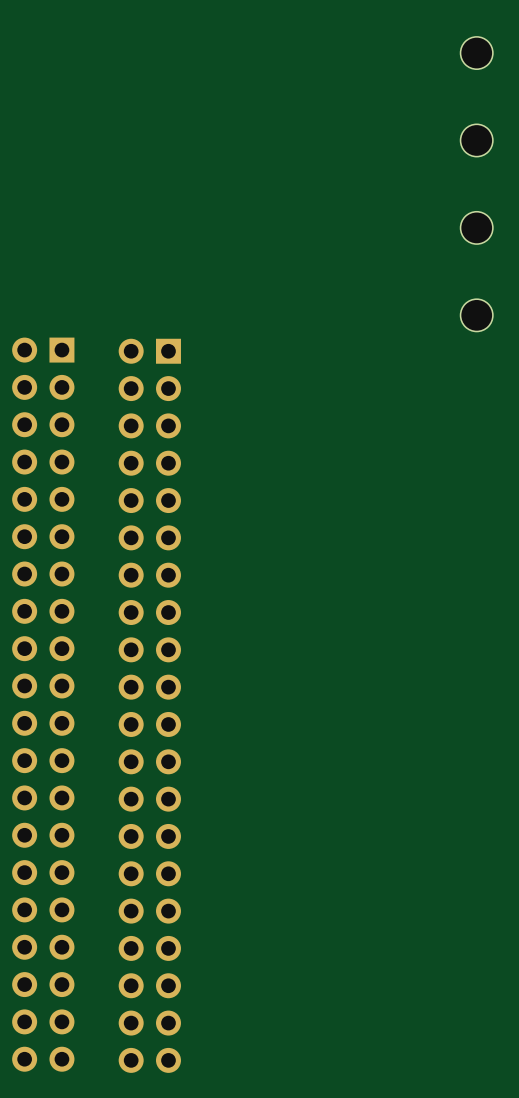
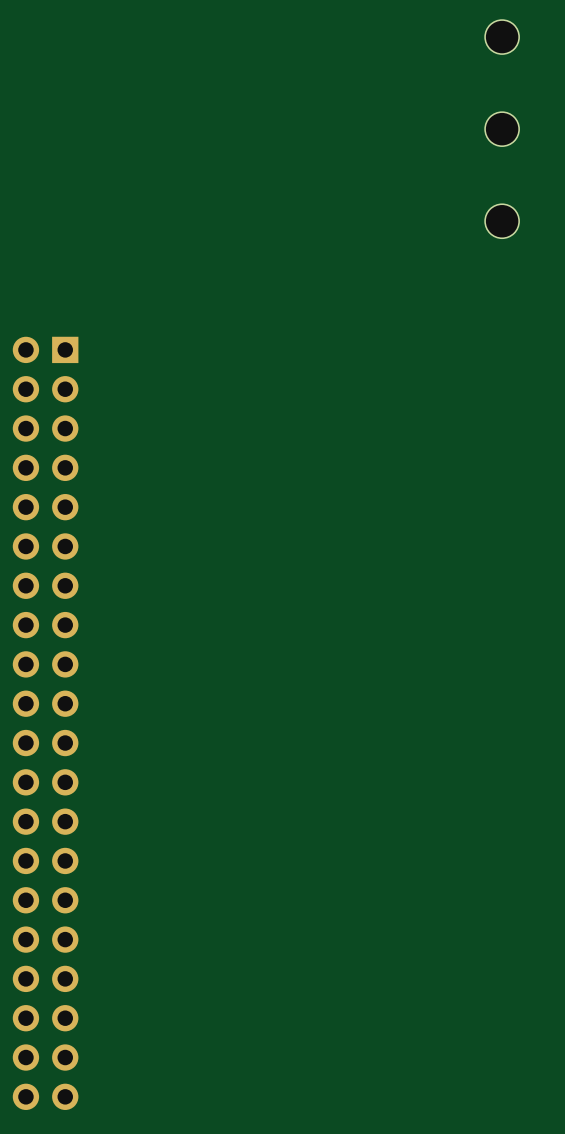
part: (476, 315) -> none
part: (149, 705) -> none

